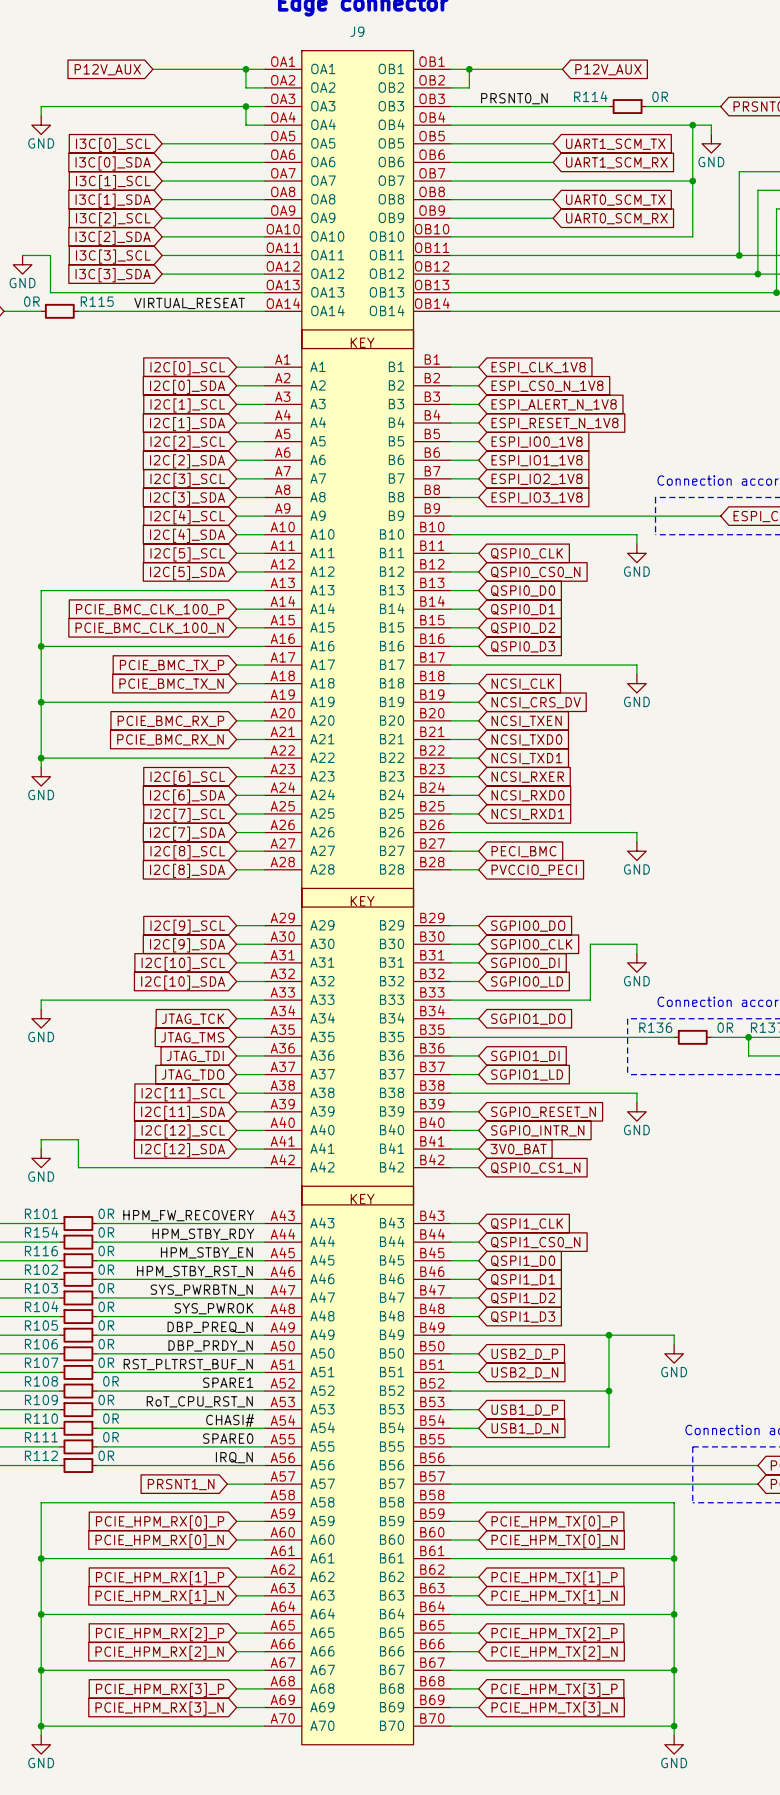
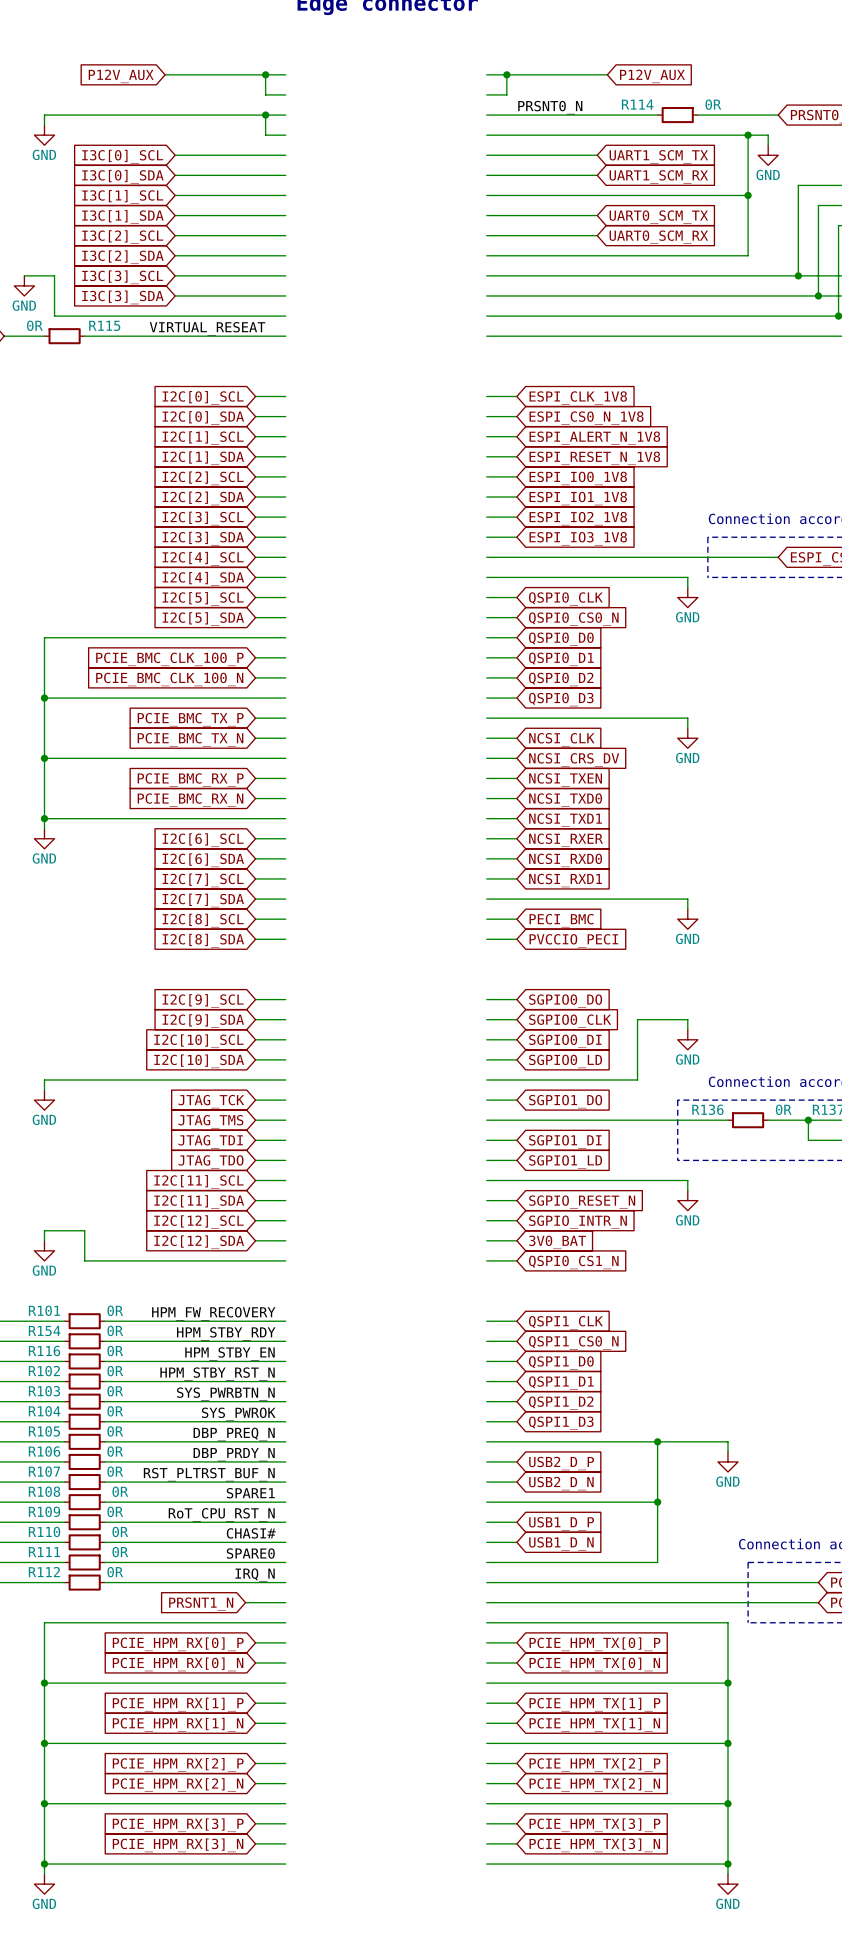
J9: (357, 897) -> none

